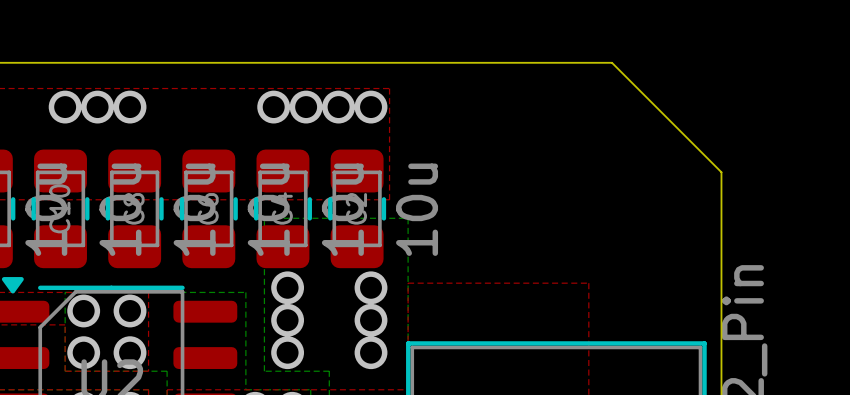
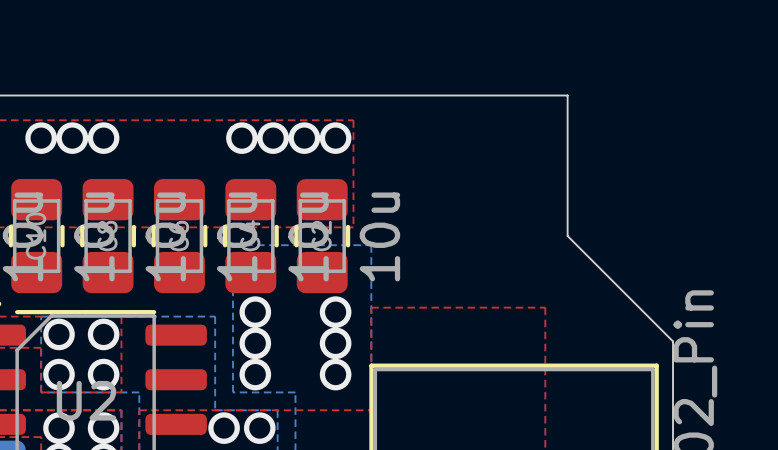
board edge: (612, 62) (721, 172) (721, 318) -> (567, 95) (567, 236) (673, 341)

